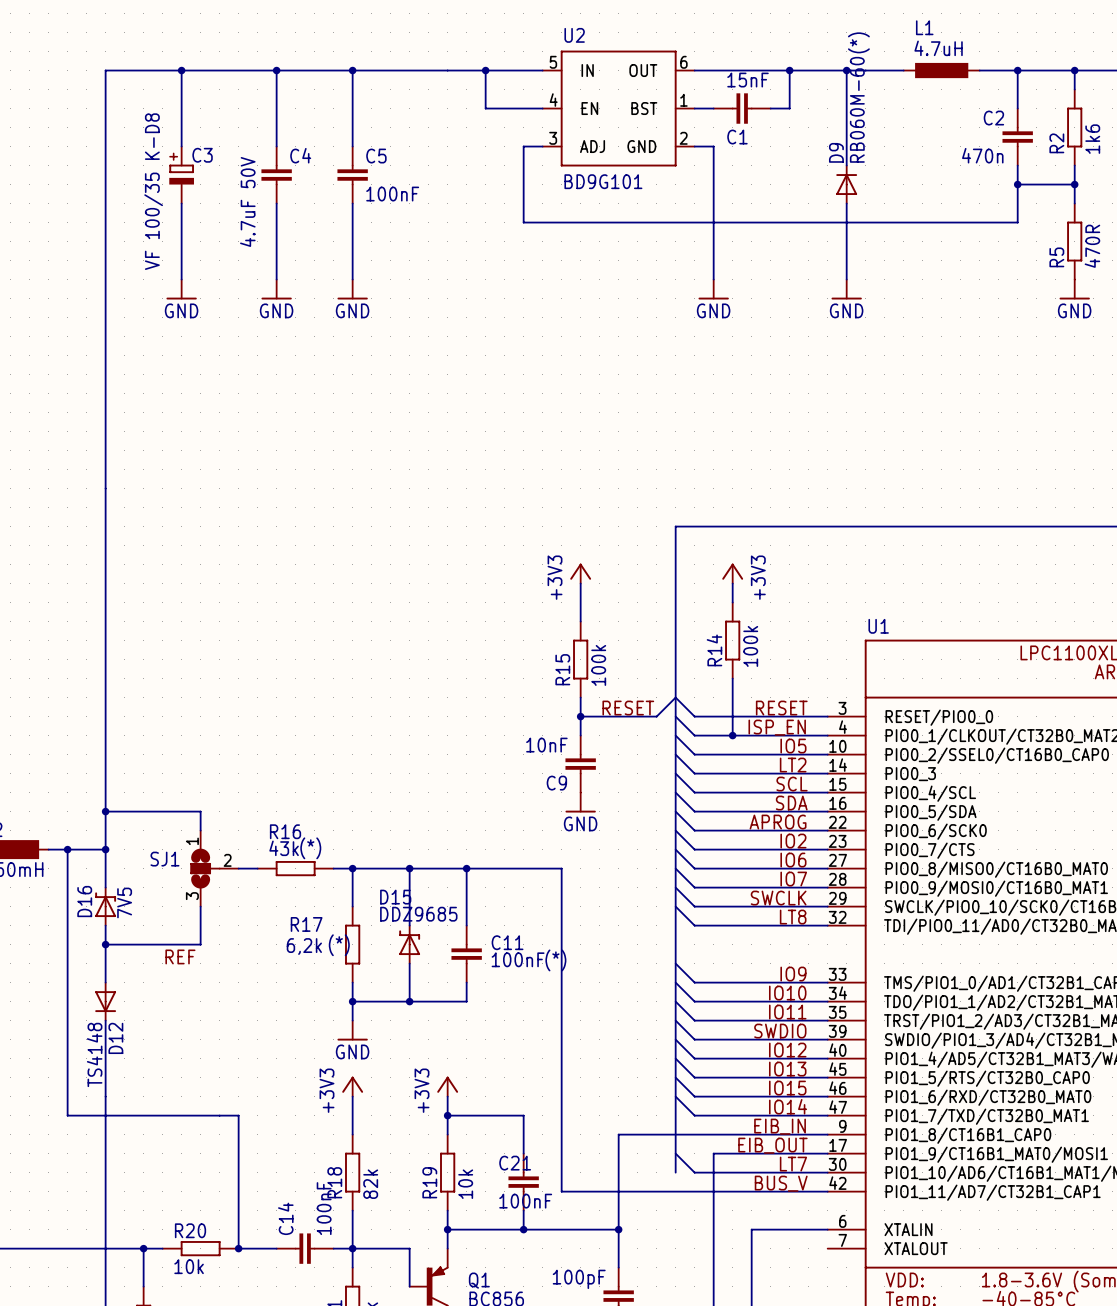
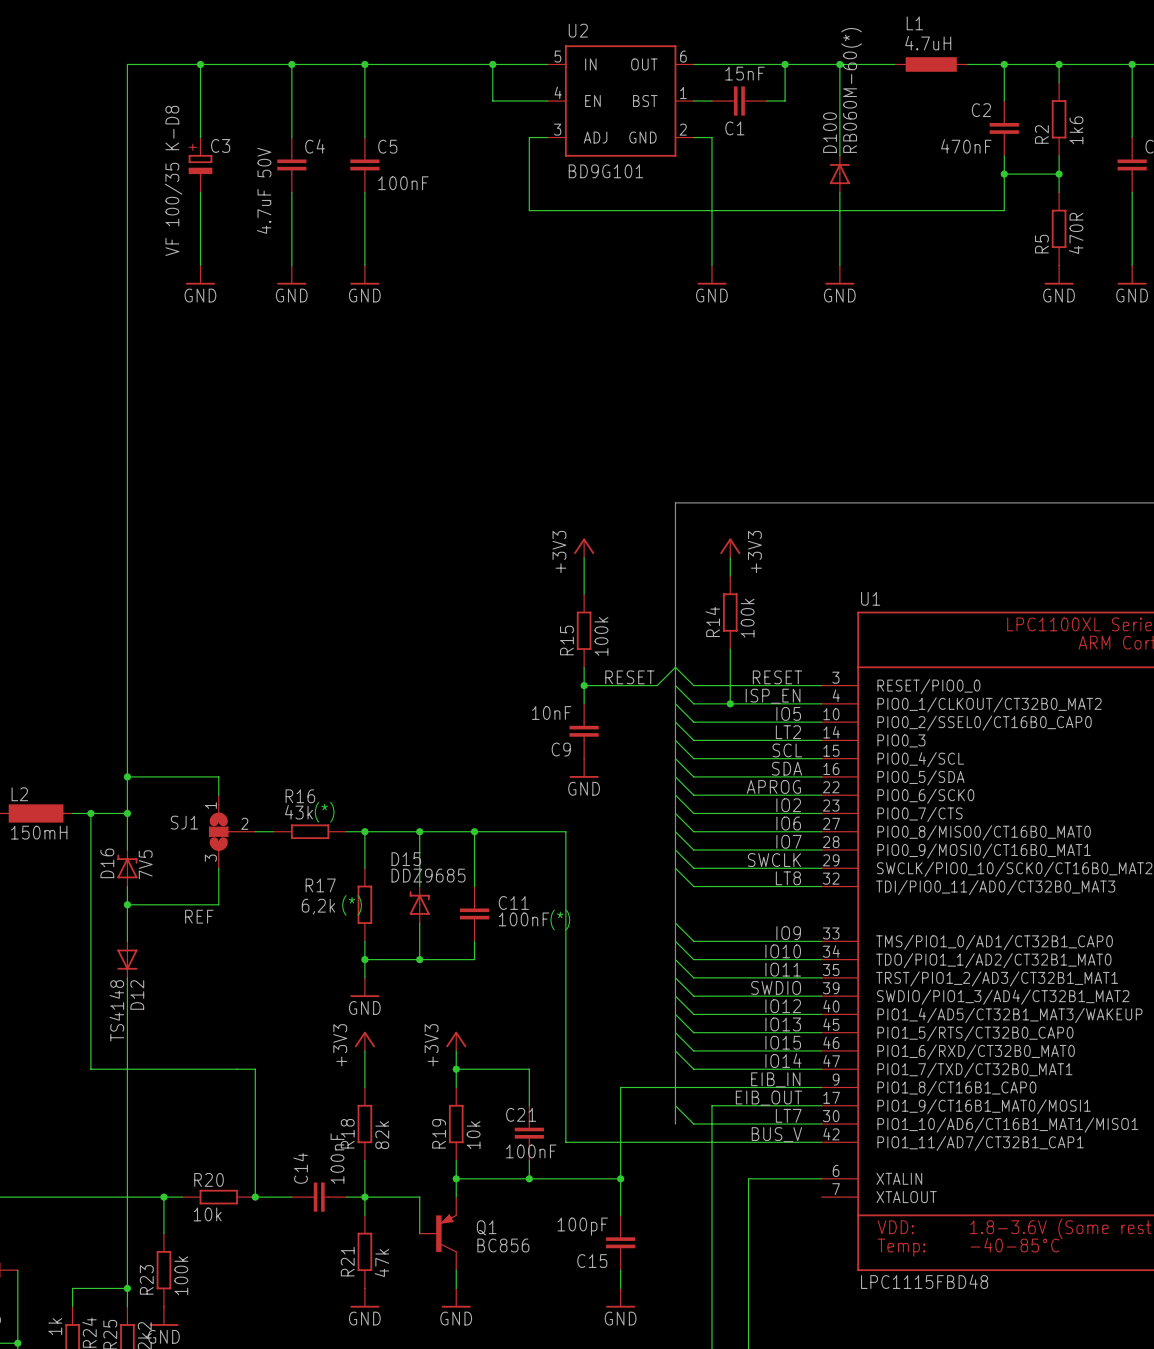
D9 name: D9 (836, 152) -> D100 (830, 132)
C2 value: 470n (982, 155) -> 470nF (966, 146)

